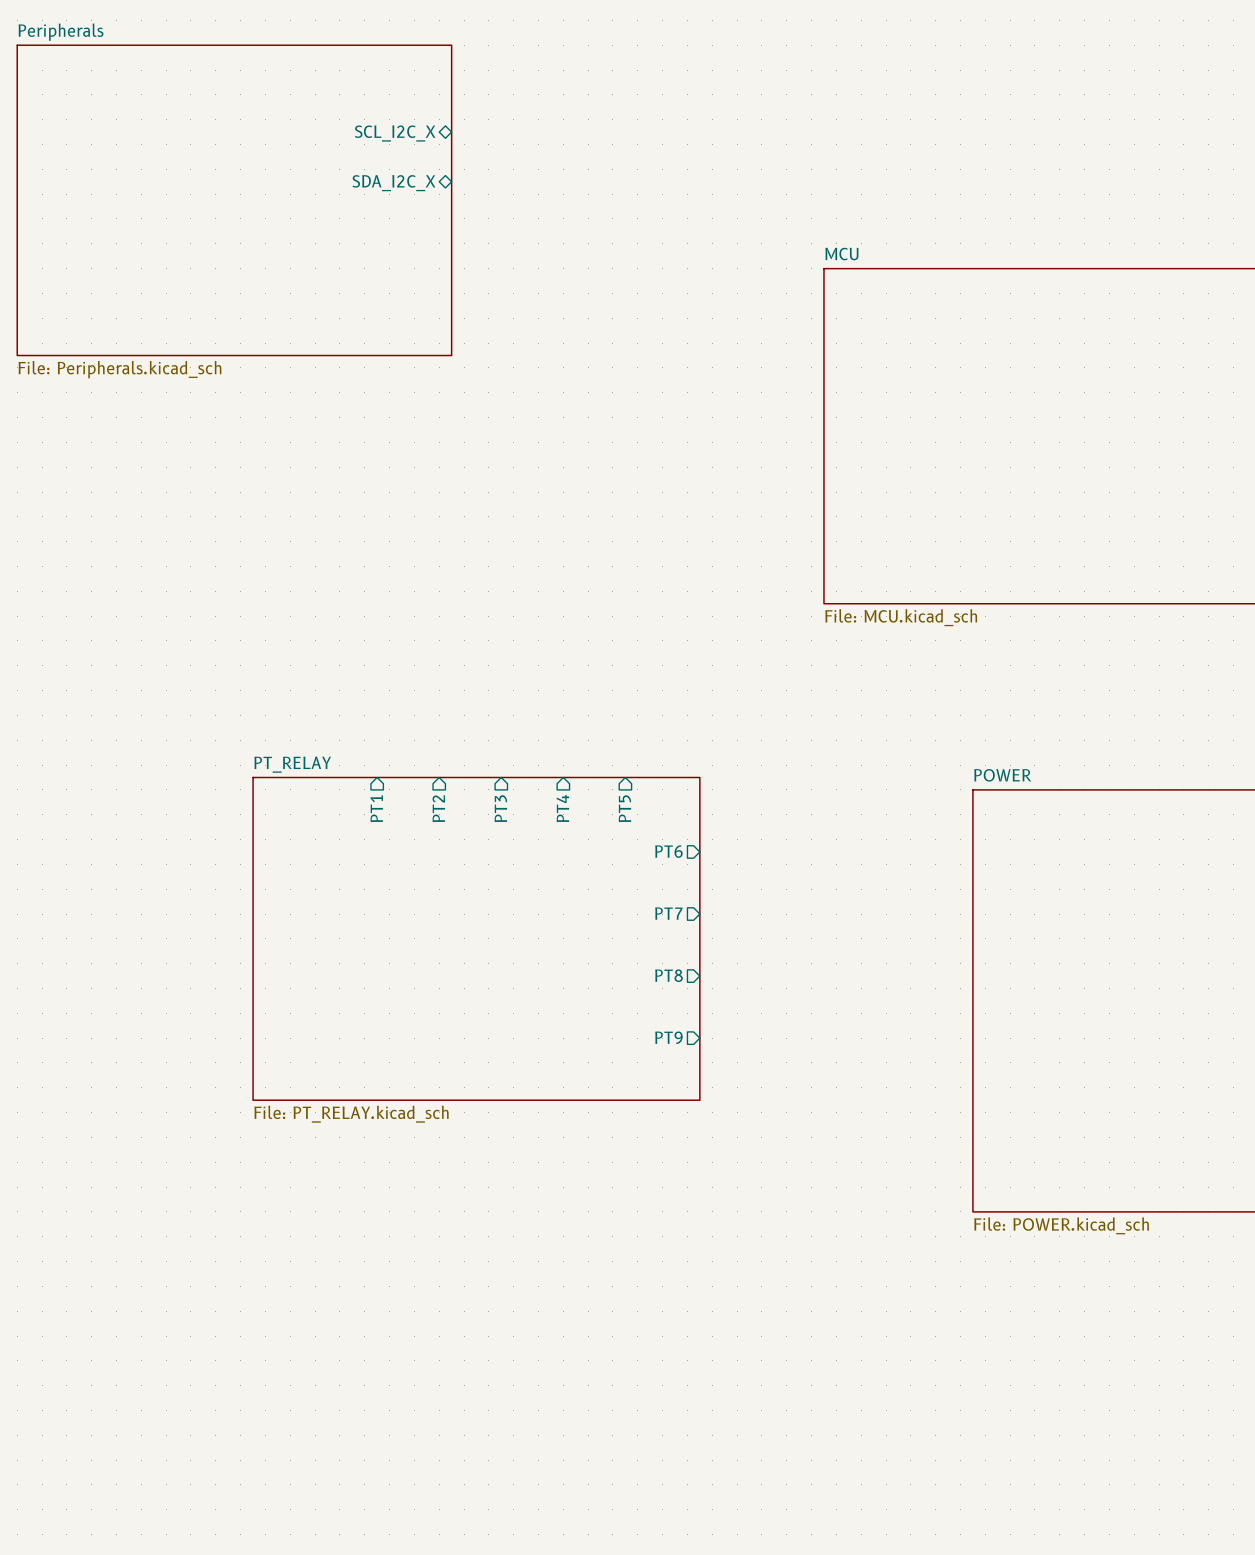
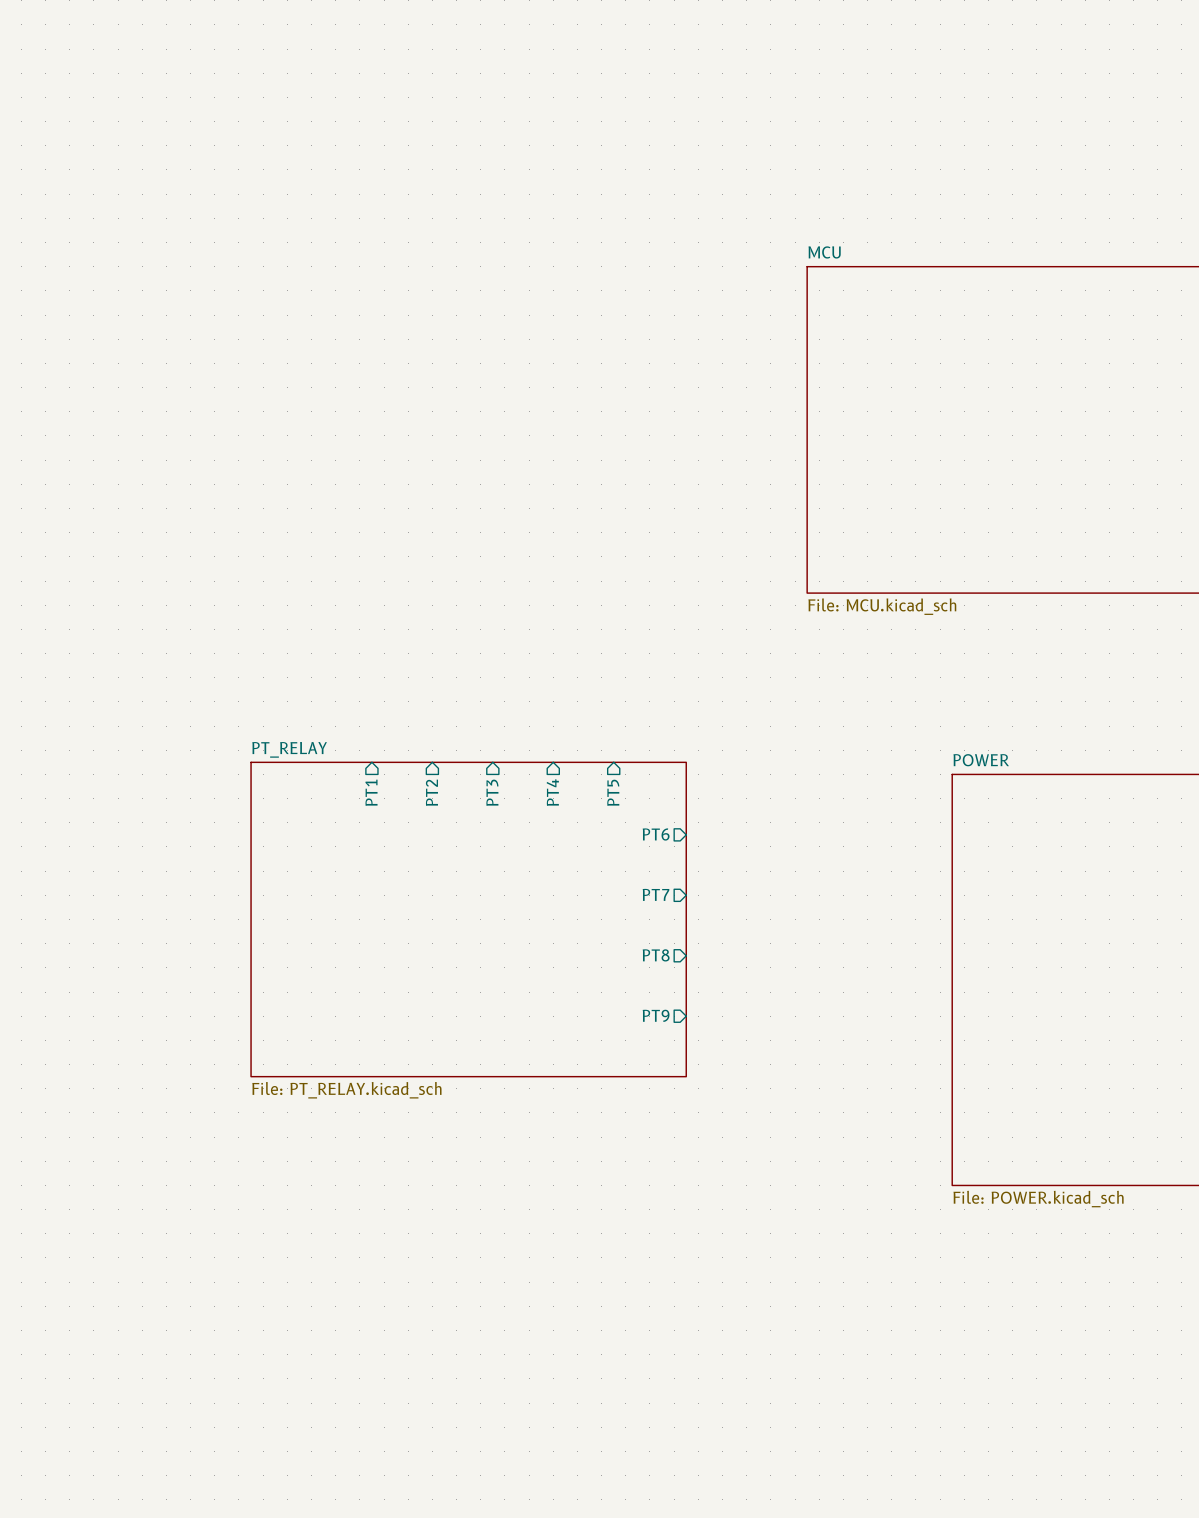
sheet pin: SCL_I2C_X (395, 133) -> none
sheet pin: SDA_I2C_X (393, 183) -> none
sheet Peripherals: File: Peripherals.kicad_sch (234, 200) -> none

